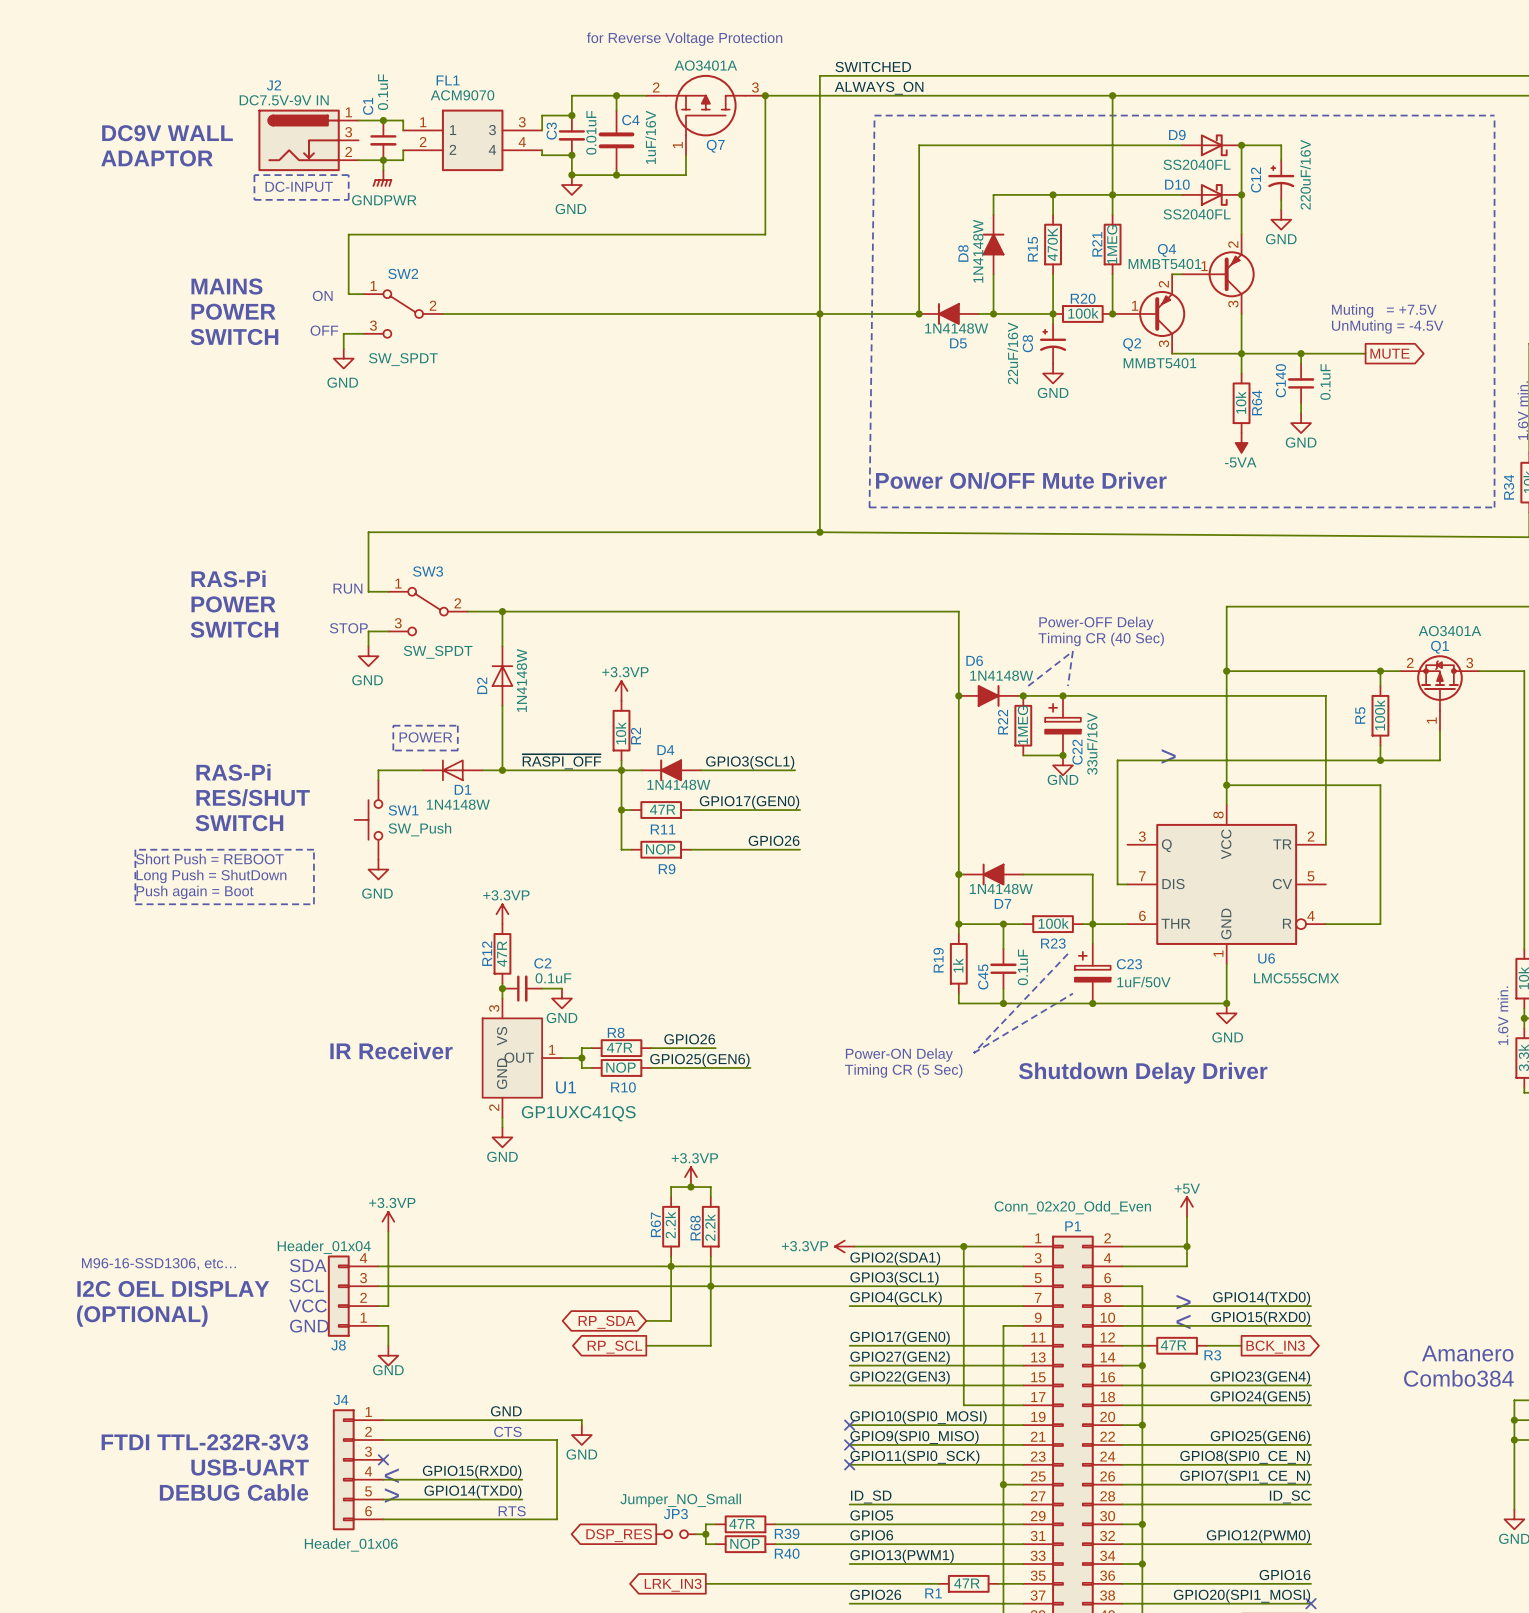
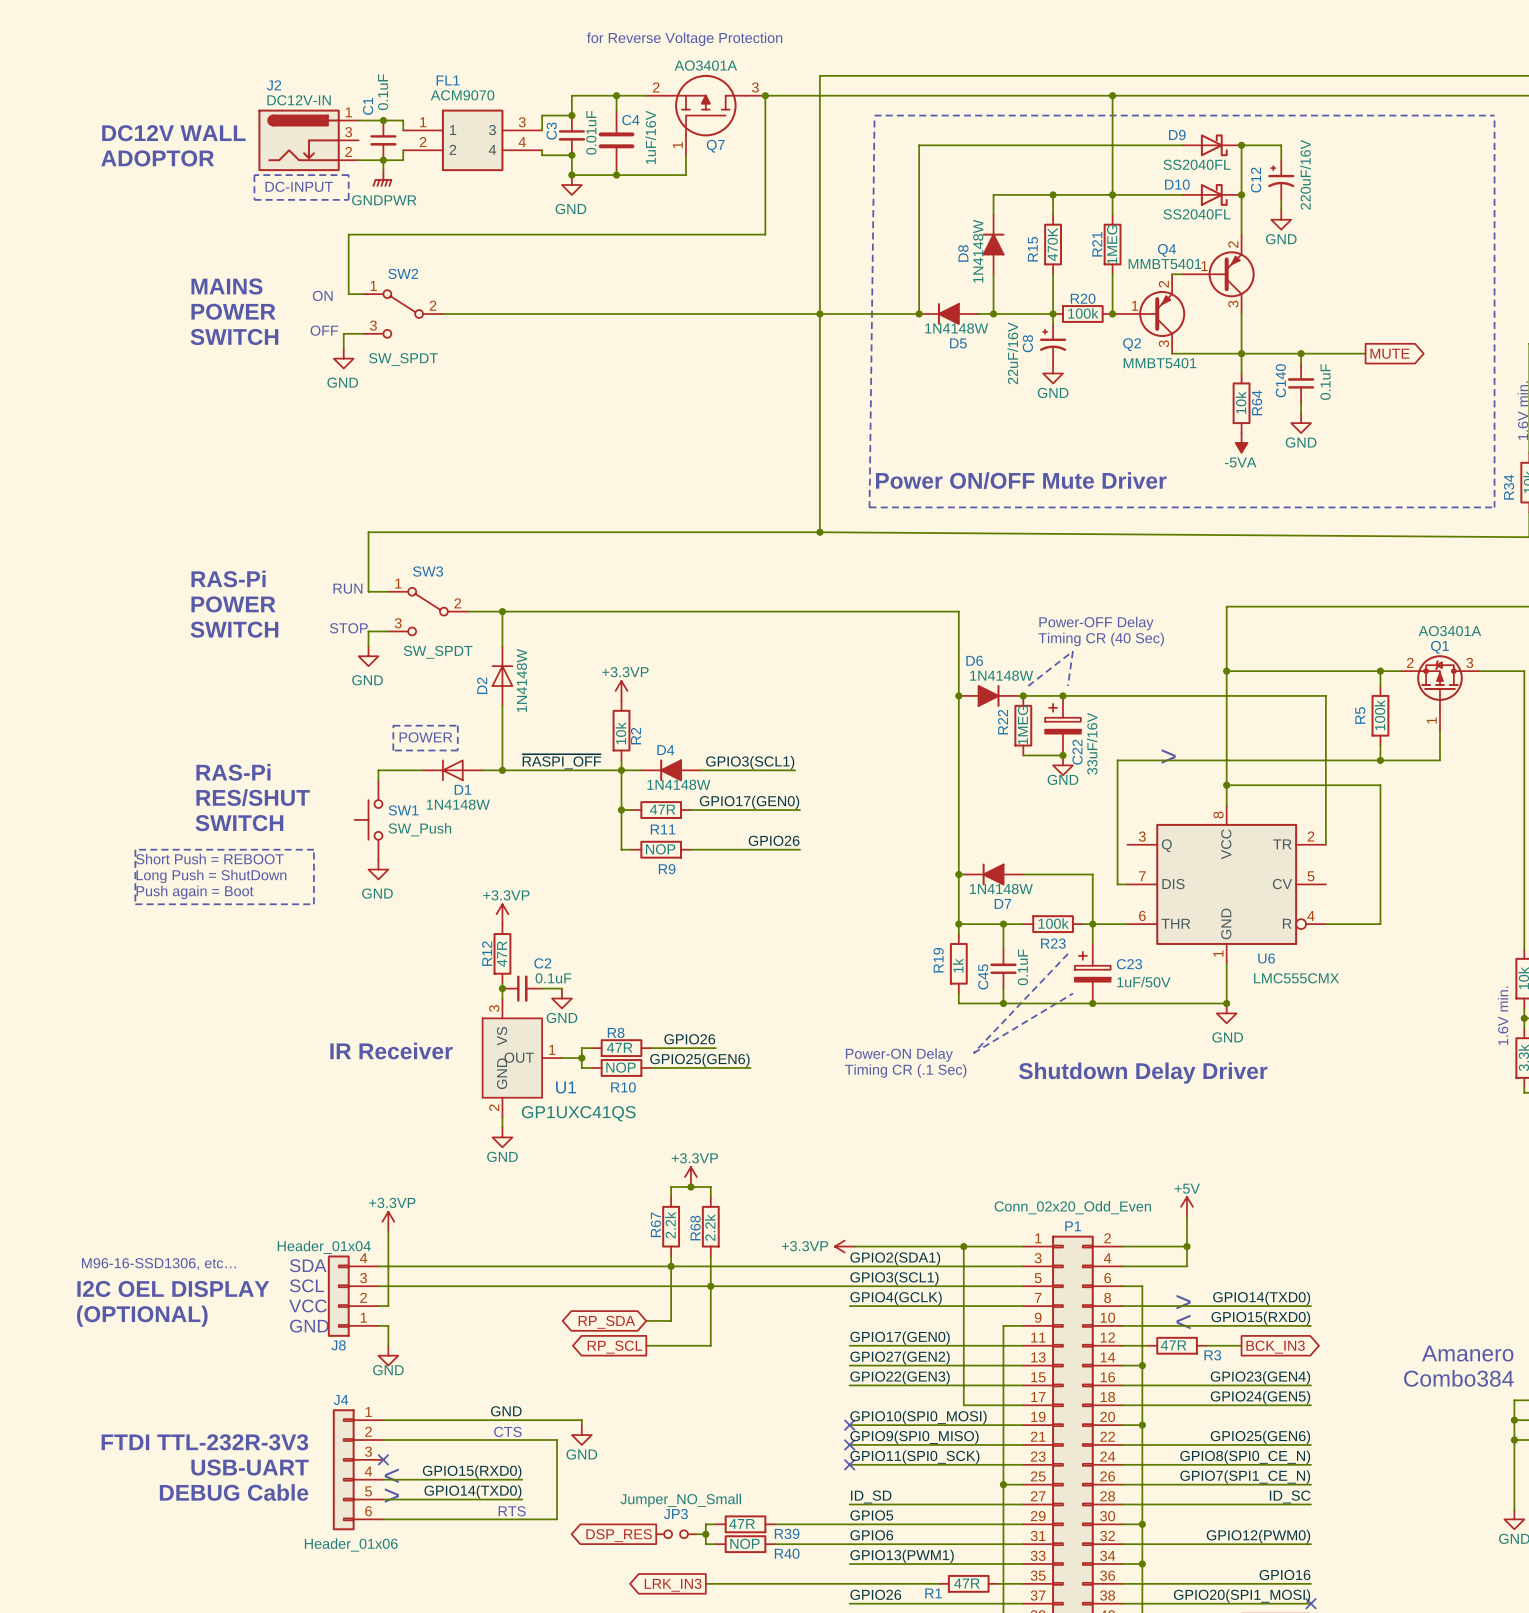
label: SWITCHED (873, 67) -> none
label: ALWAYS_ON (879, 88) -> none
J2 value: DC7.5V-9V IN (284, 100) -> DC12V-IN (299, 100)
text: DC9V WALL (167, 133) -> DC12V WALL (173, 133)
text: ADAPTOR (157, 158) -> ADOPTOR (157, 158)
text: Muting = +7.5V (1384, 310) -> none
text: UnMuting = -4.5V (1387, 326) -> none
text: Timing CR (5 Sec) (903, 1070) -> Timing CR (.1 Sec) (905, 1070)

